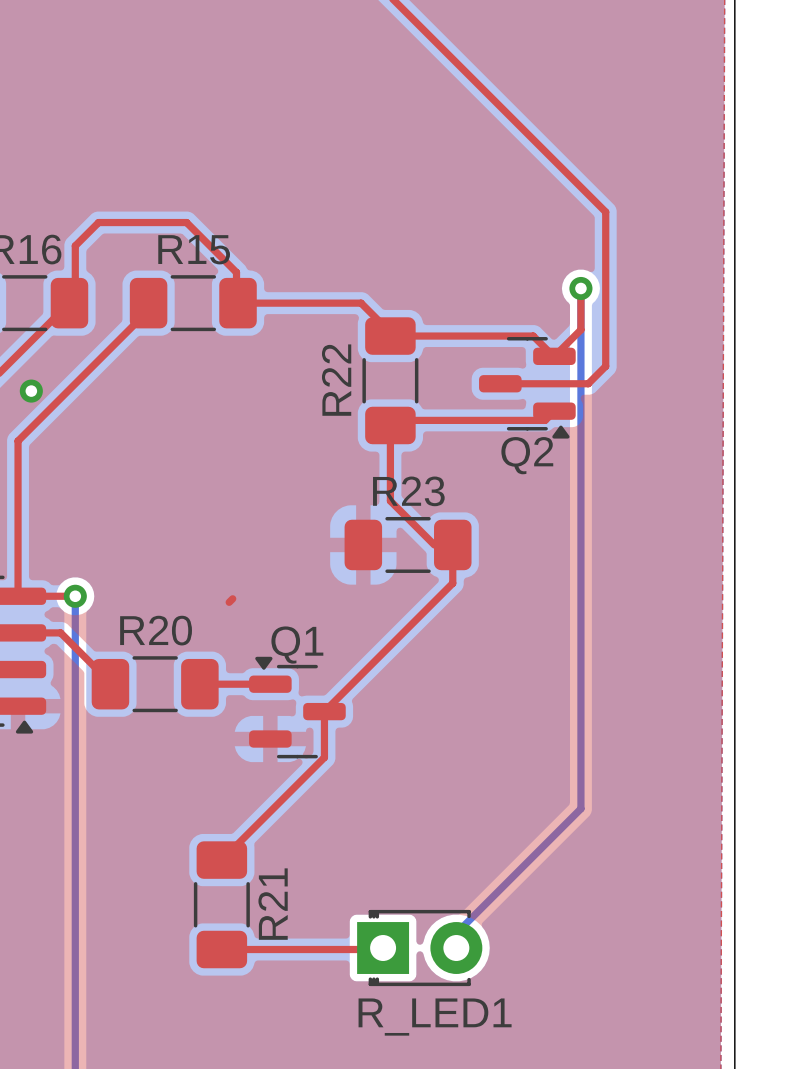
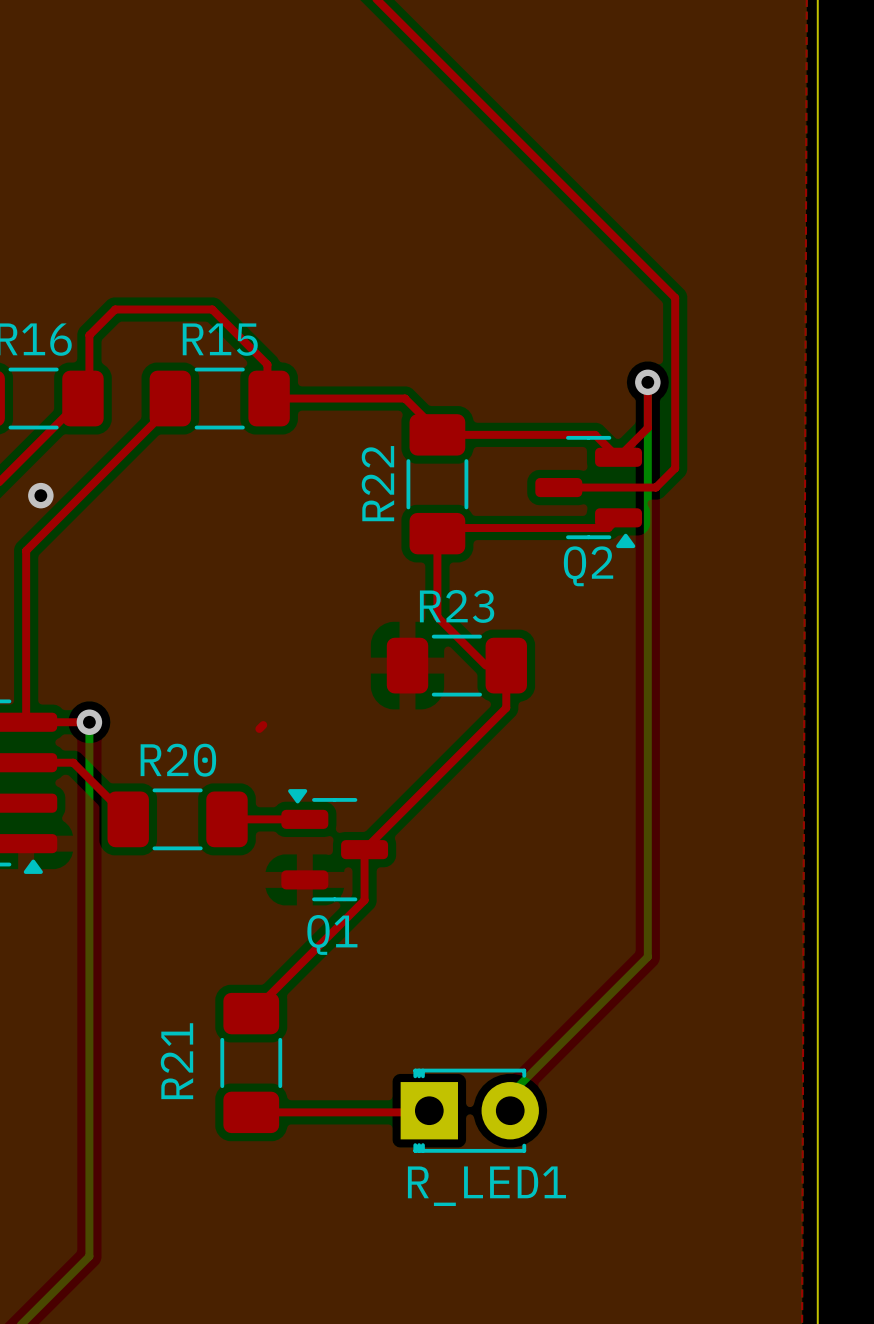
Q1 name position: Q1 (297, 645) -> Q1 (332, 934)
R21 name position: R21 (273, 904) -> R21 (176, 1061)

